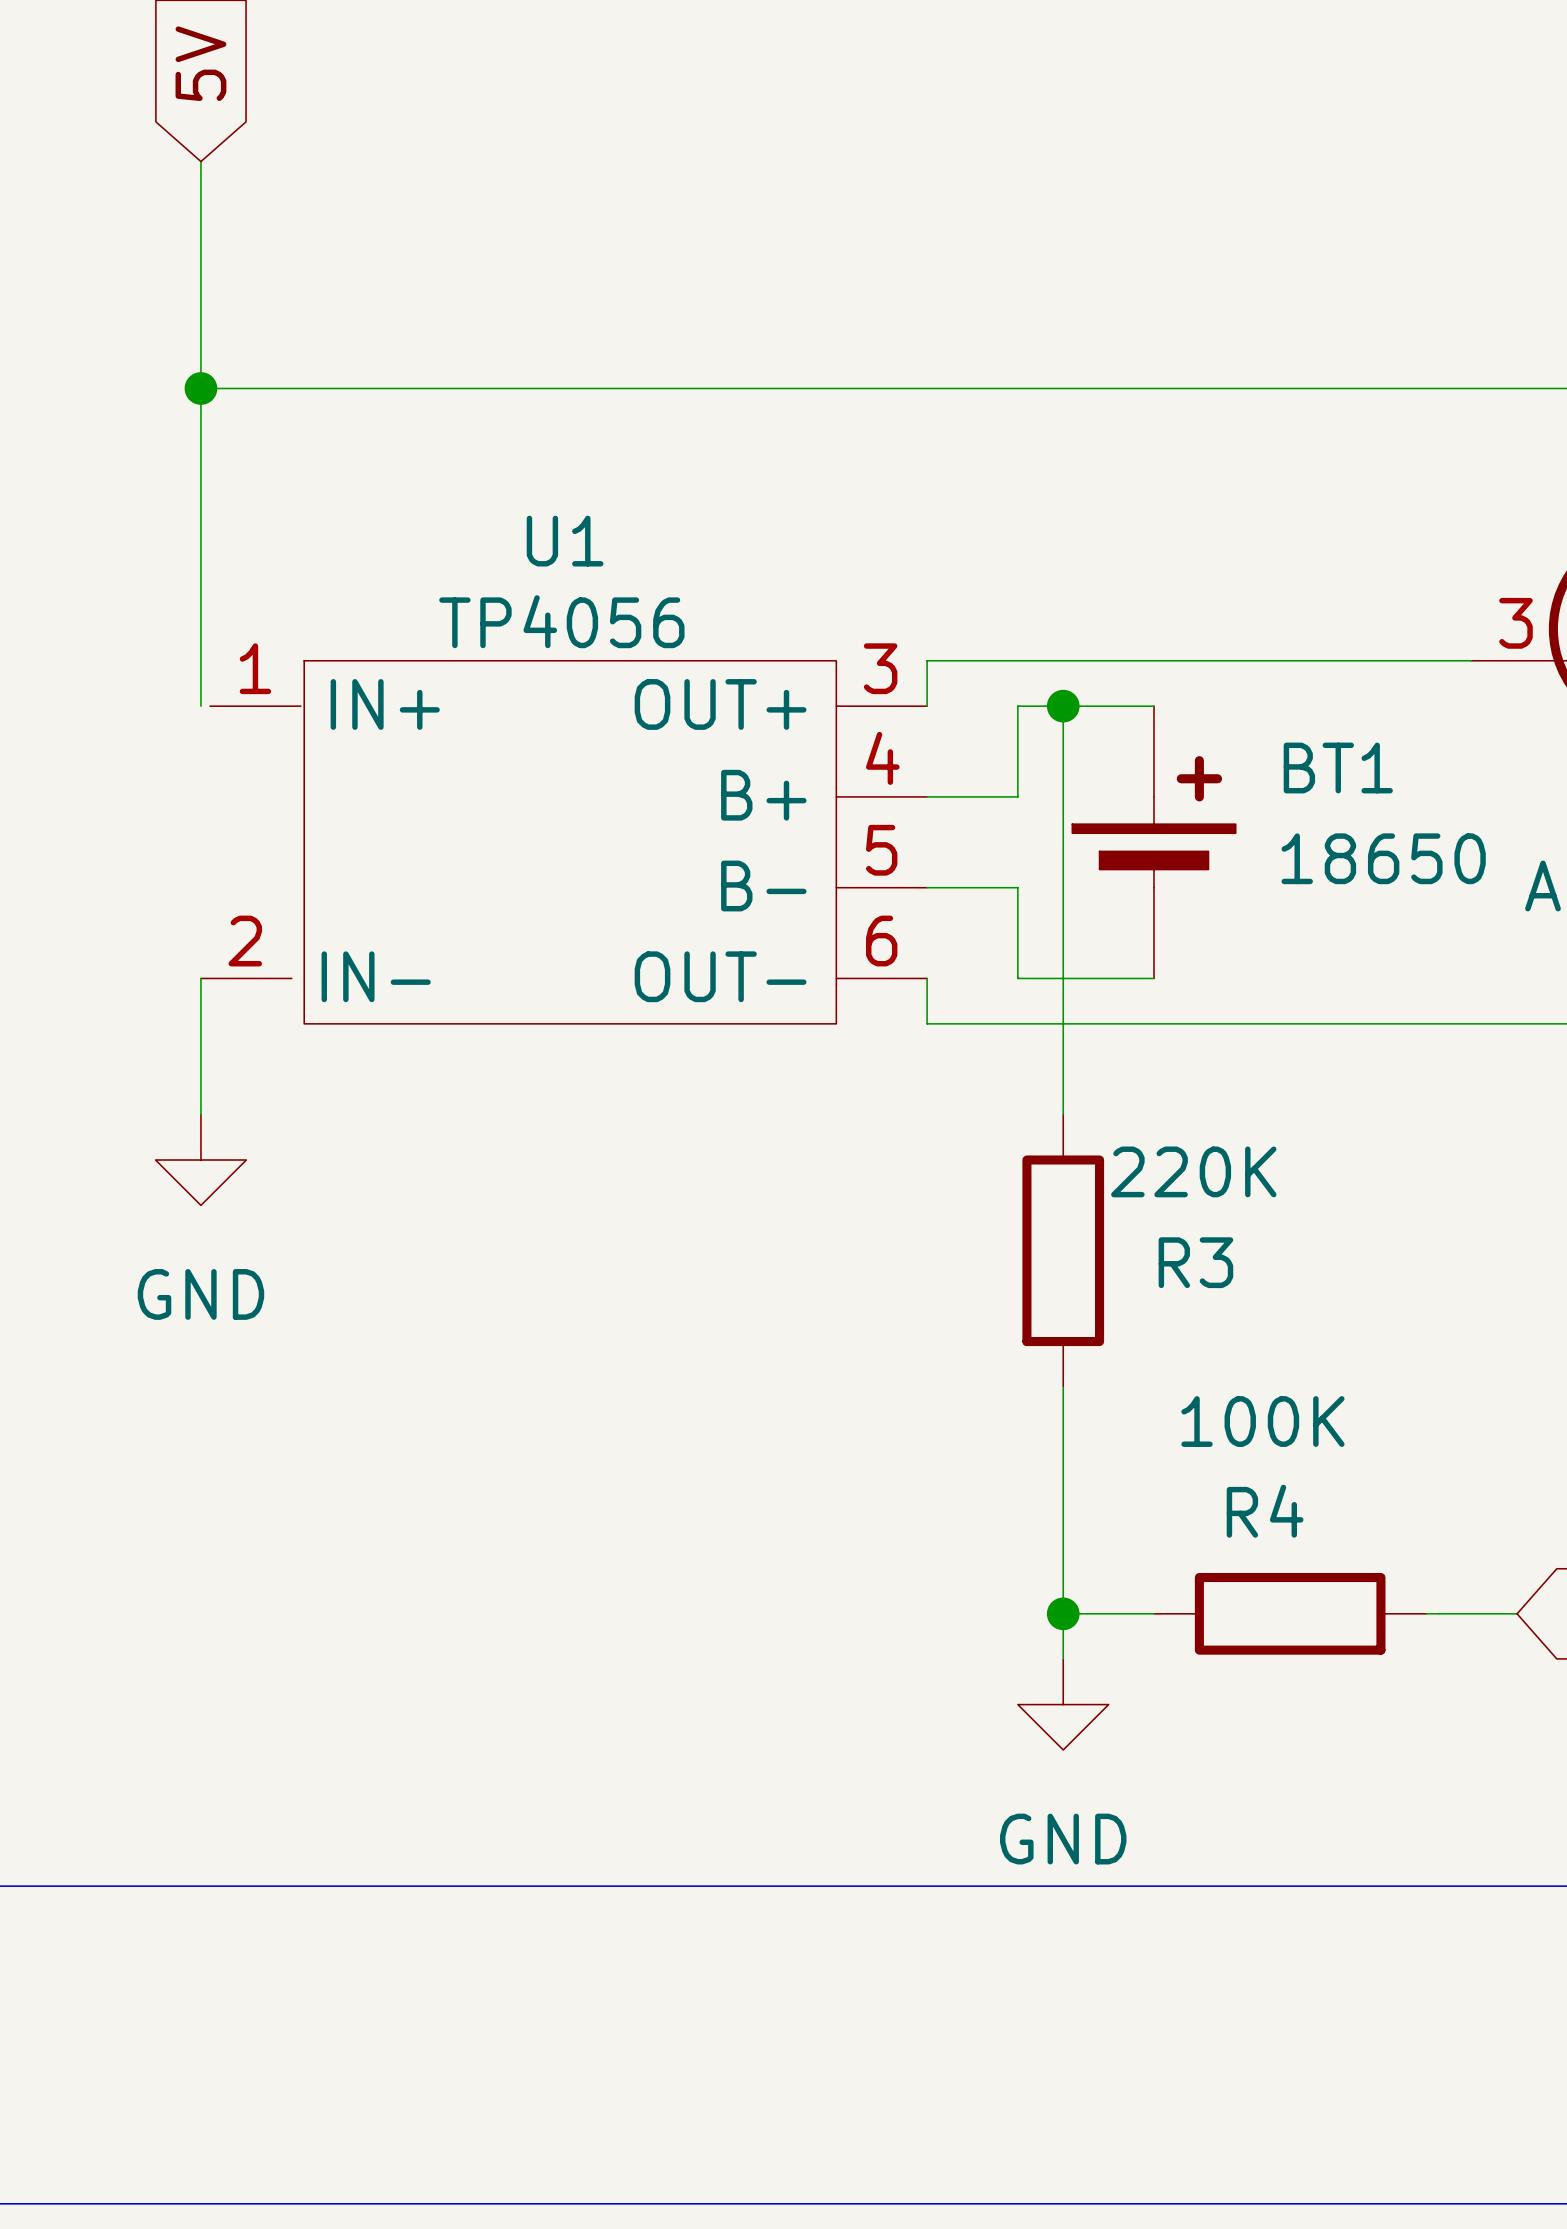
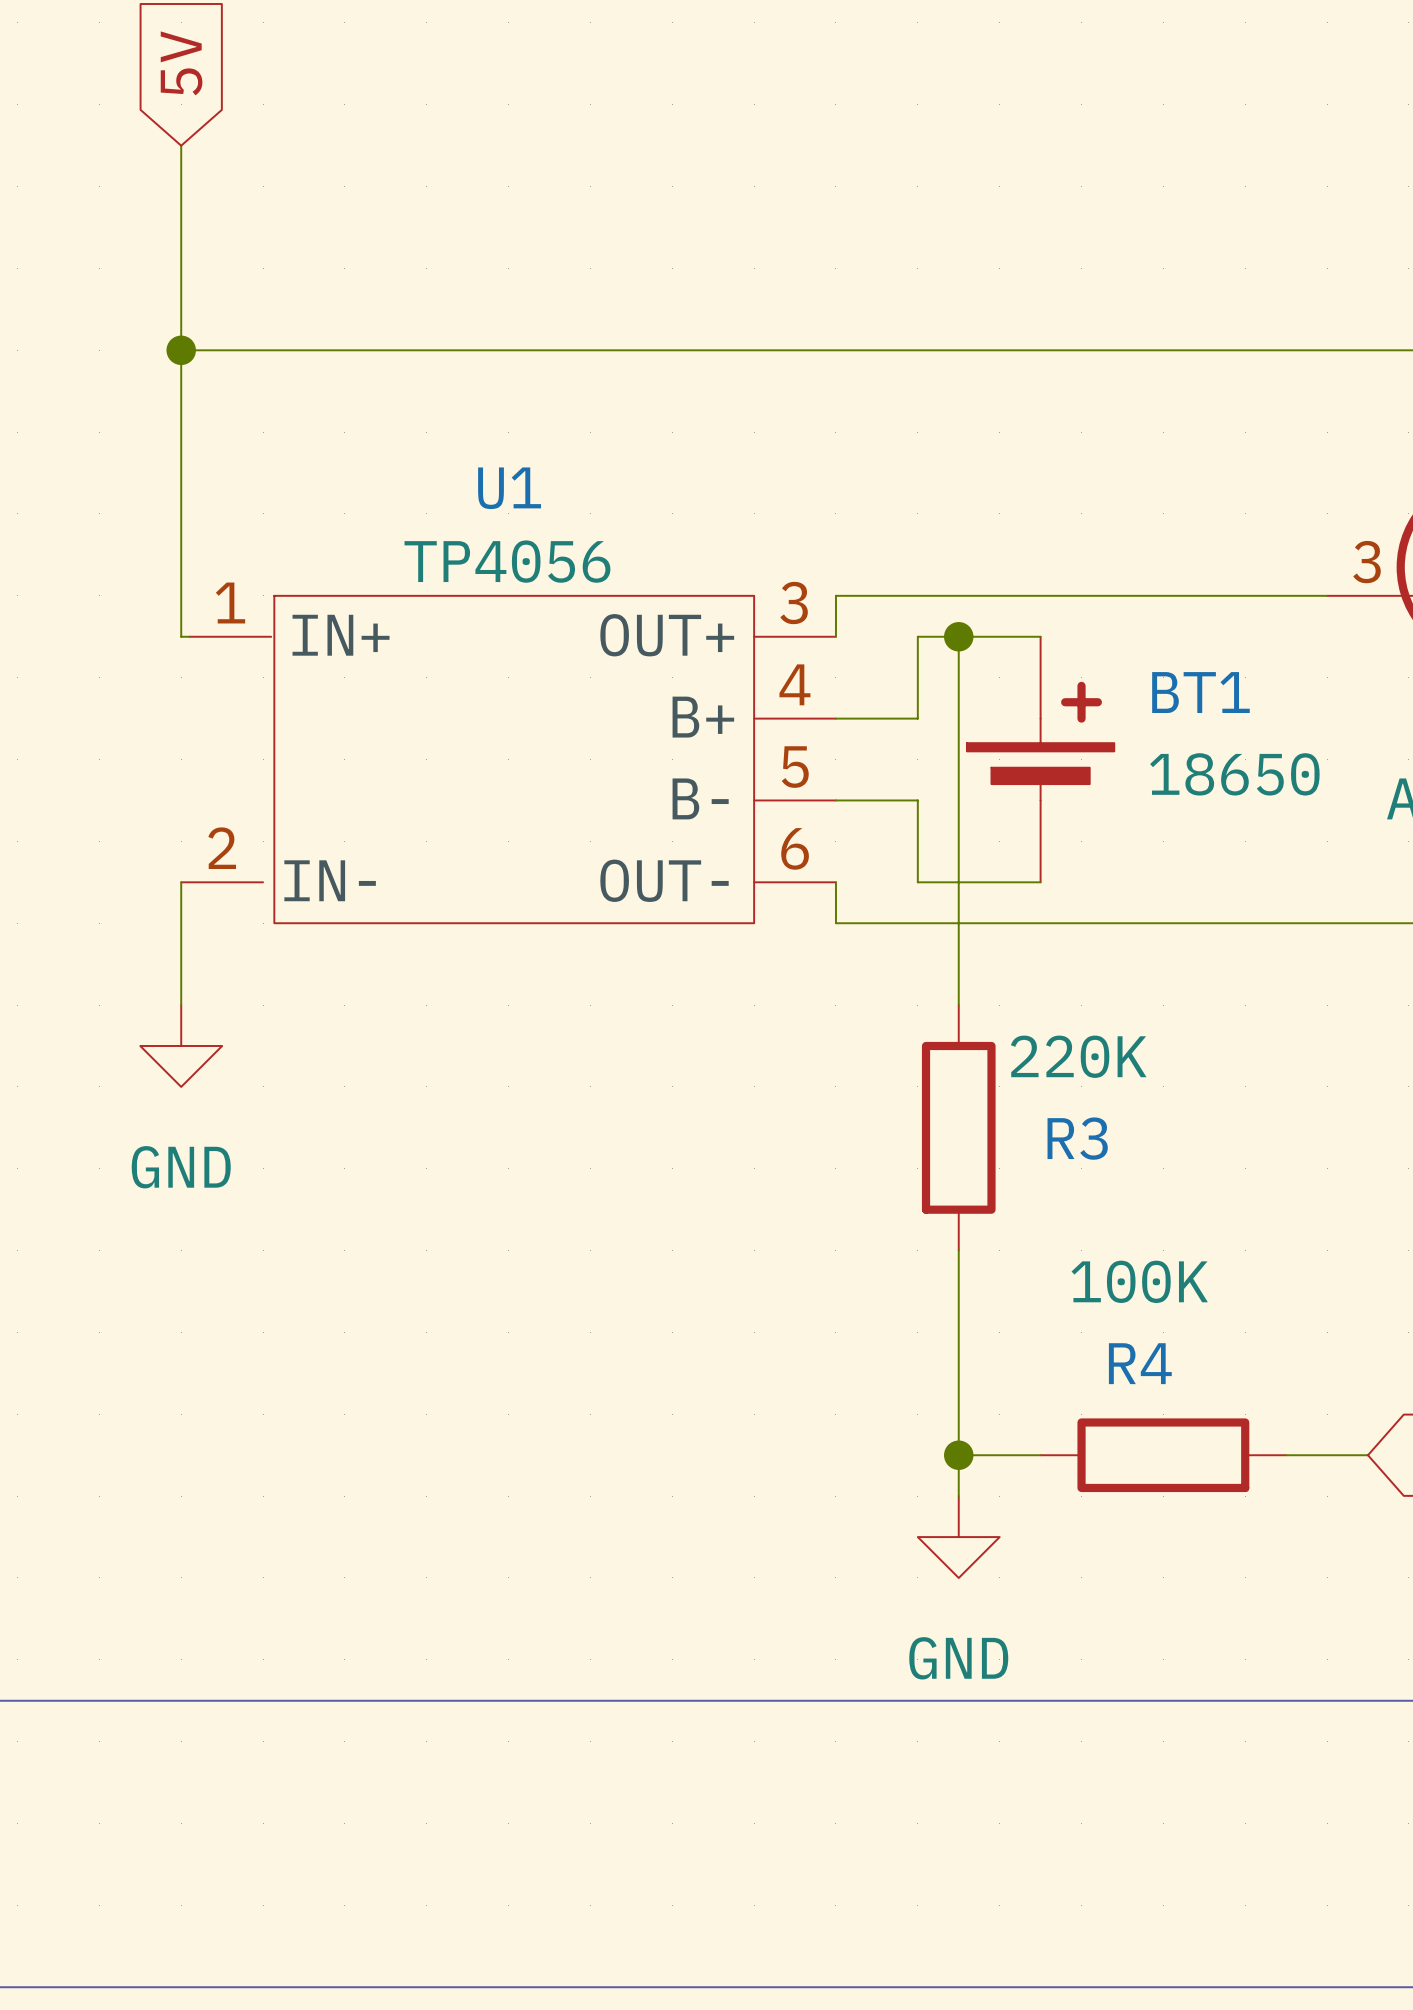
wire: none -> (181, 636) (189, 636)

